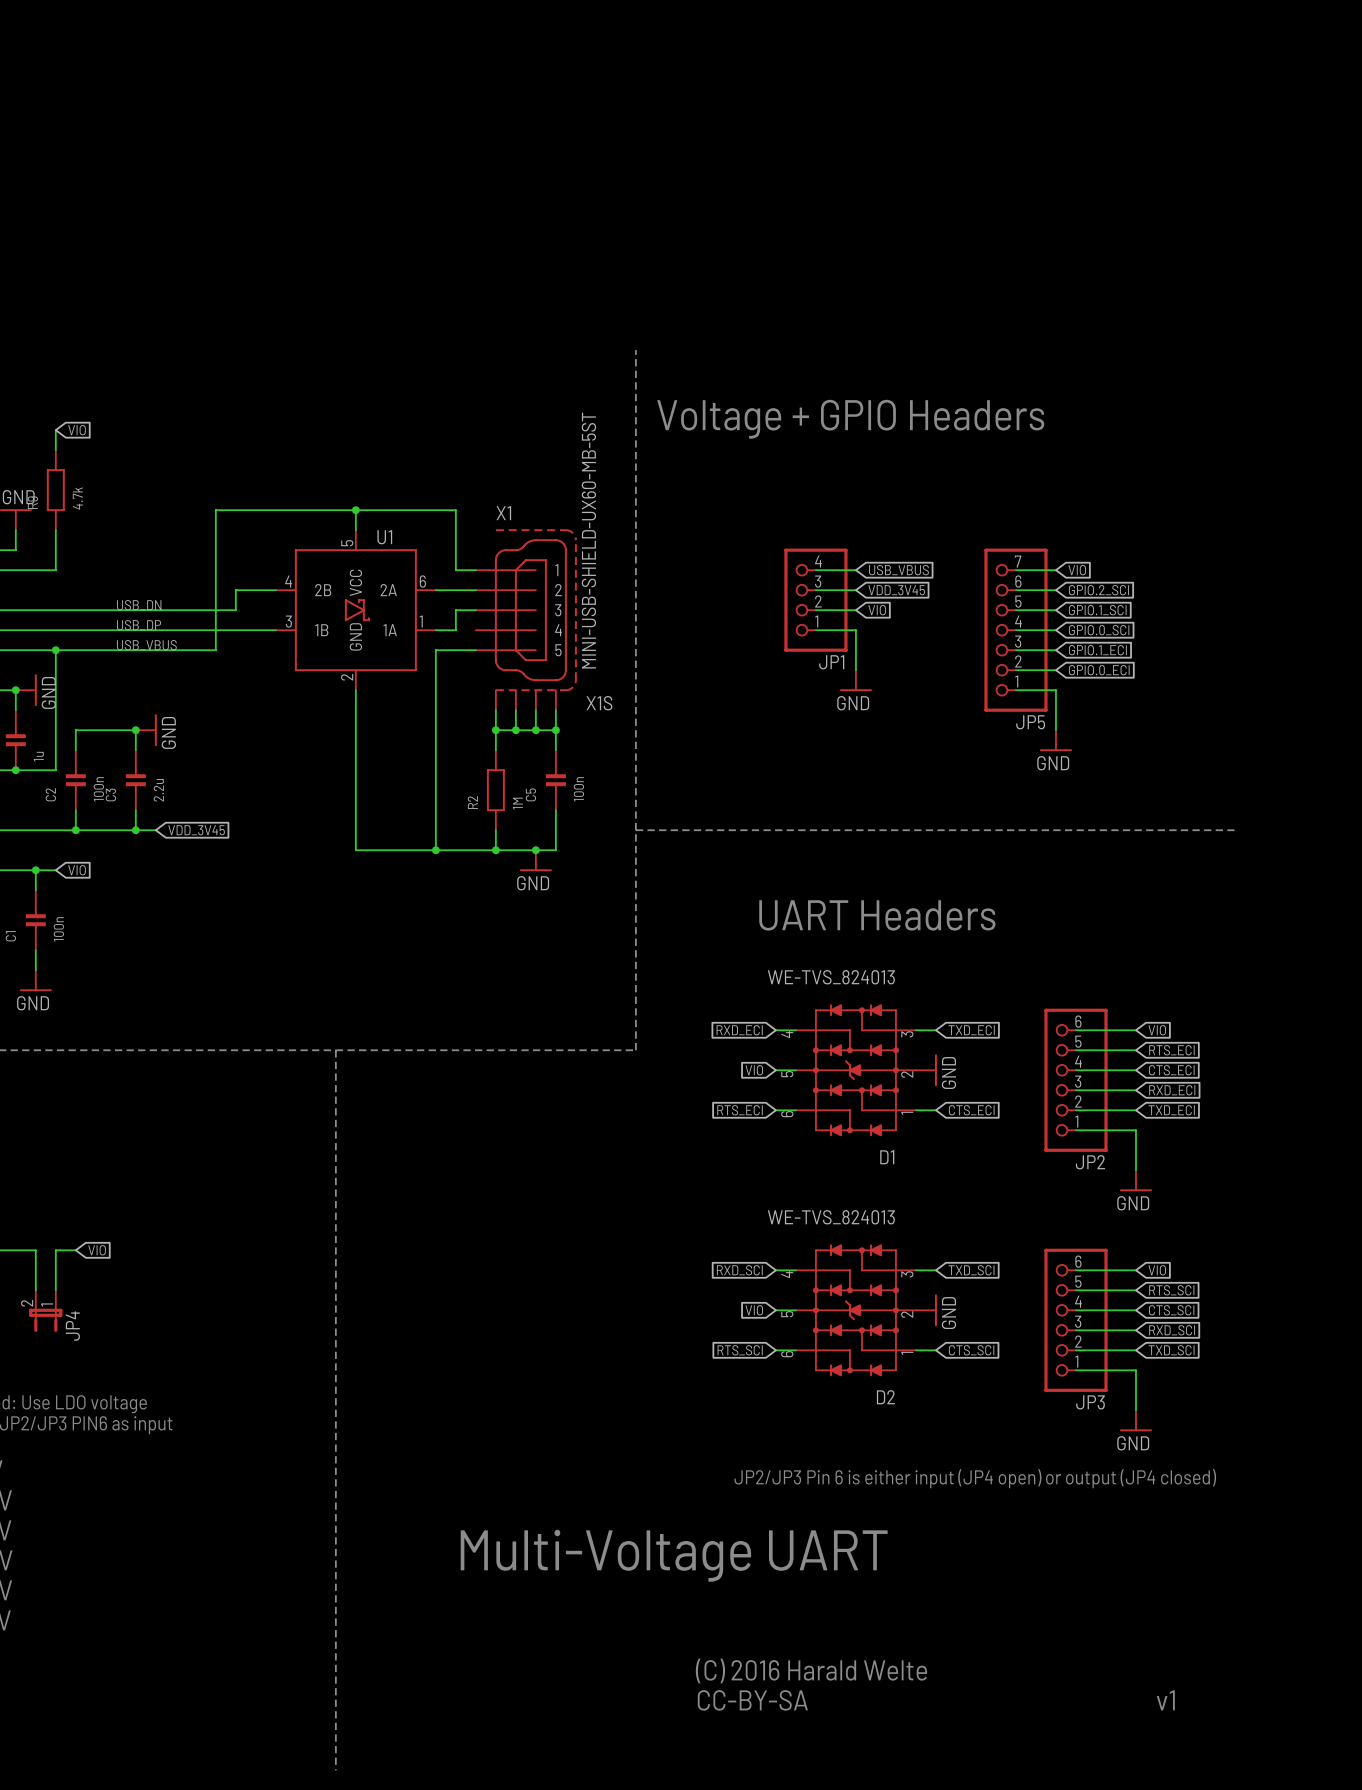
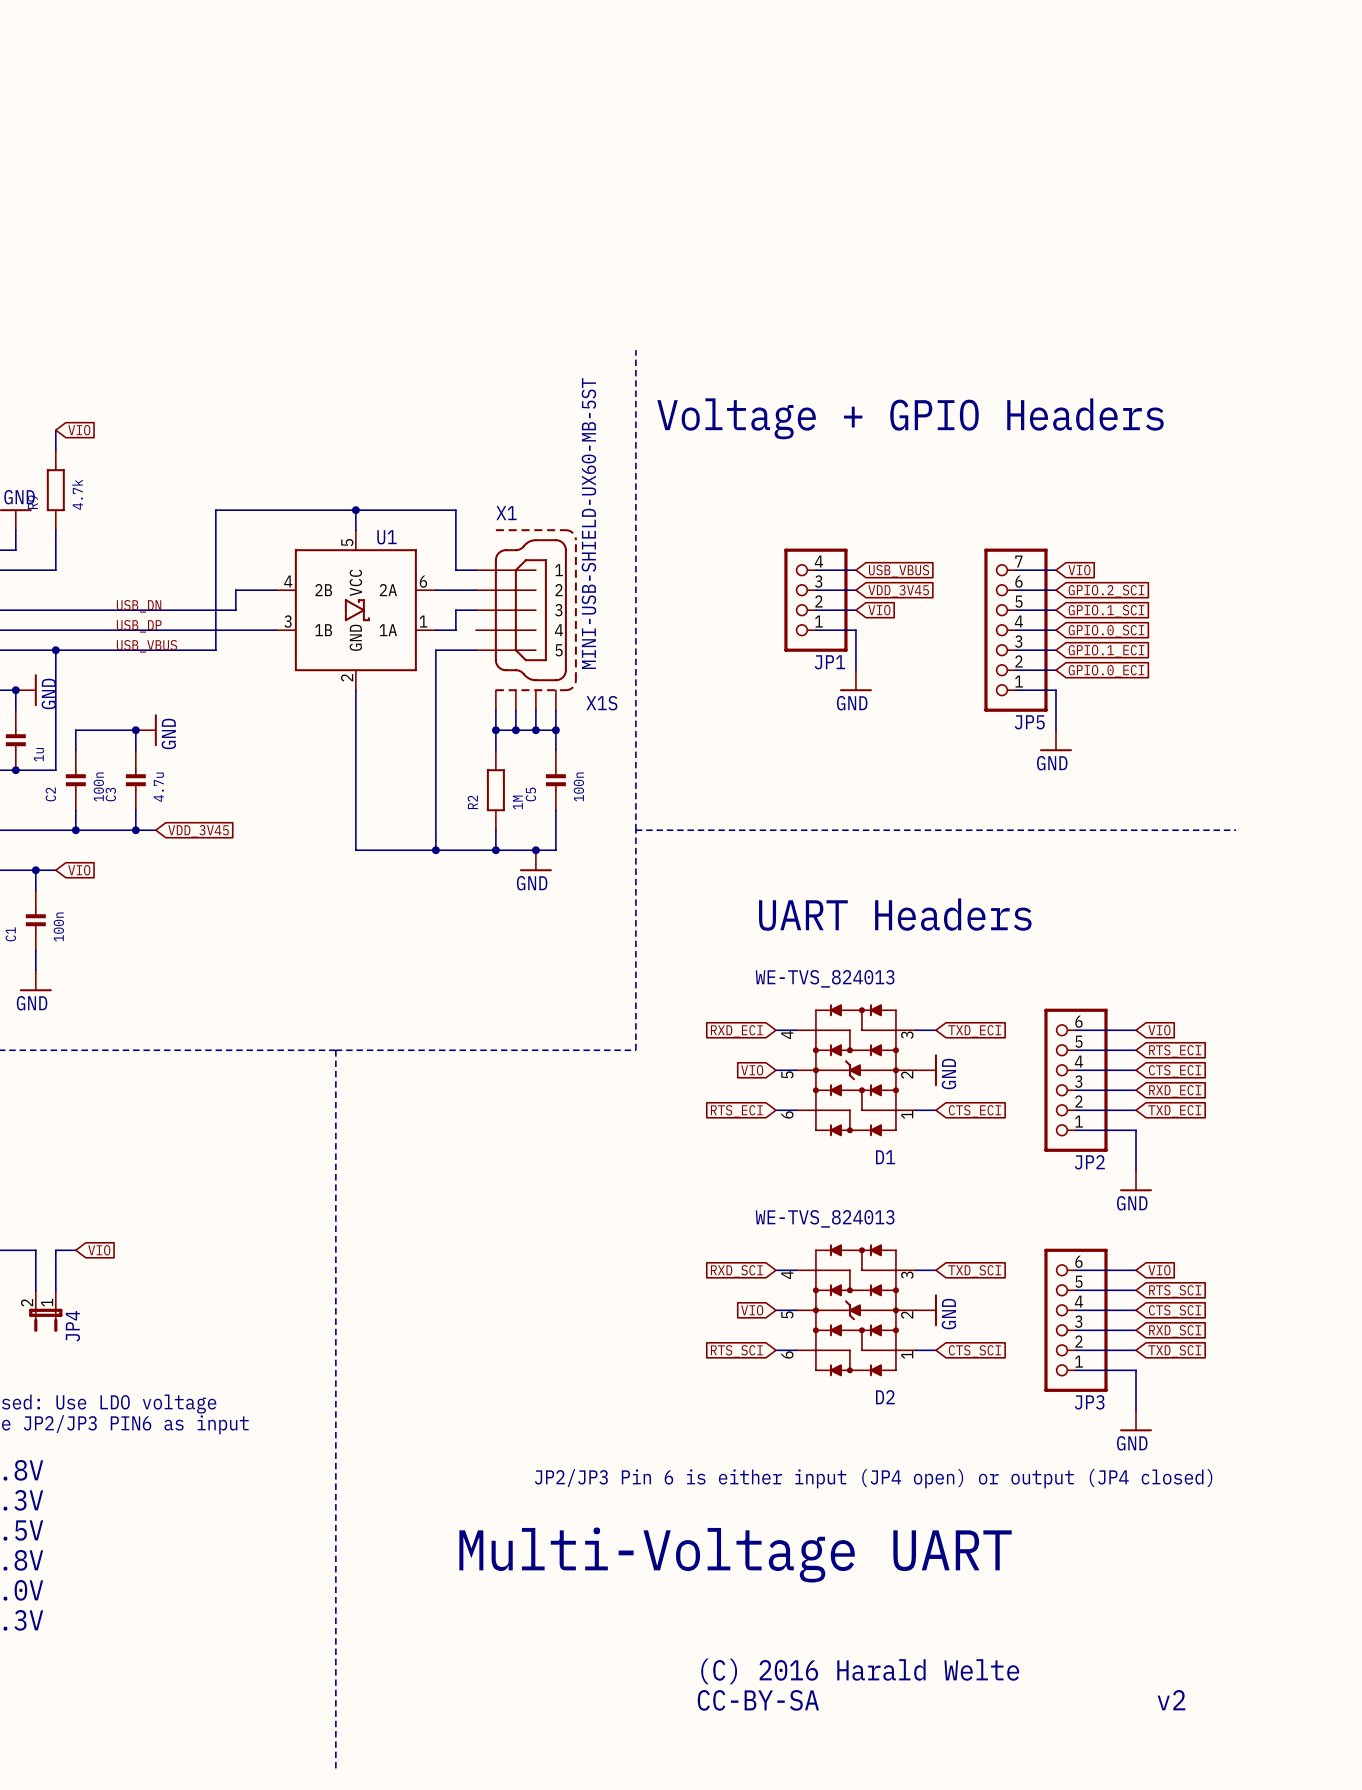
C3 value: 2.2u (158, 790) -> 4.7u (158, 787)
text: v1 (1165, 1700) -> v2 (1171, 1700)

